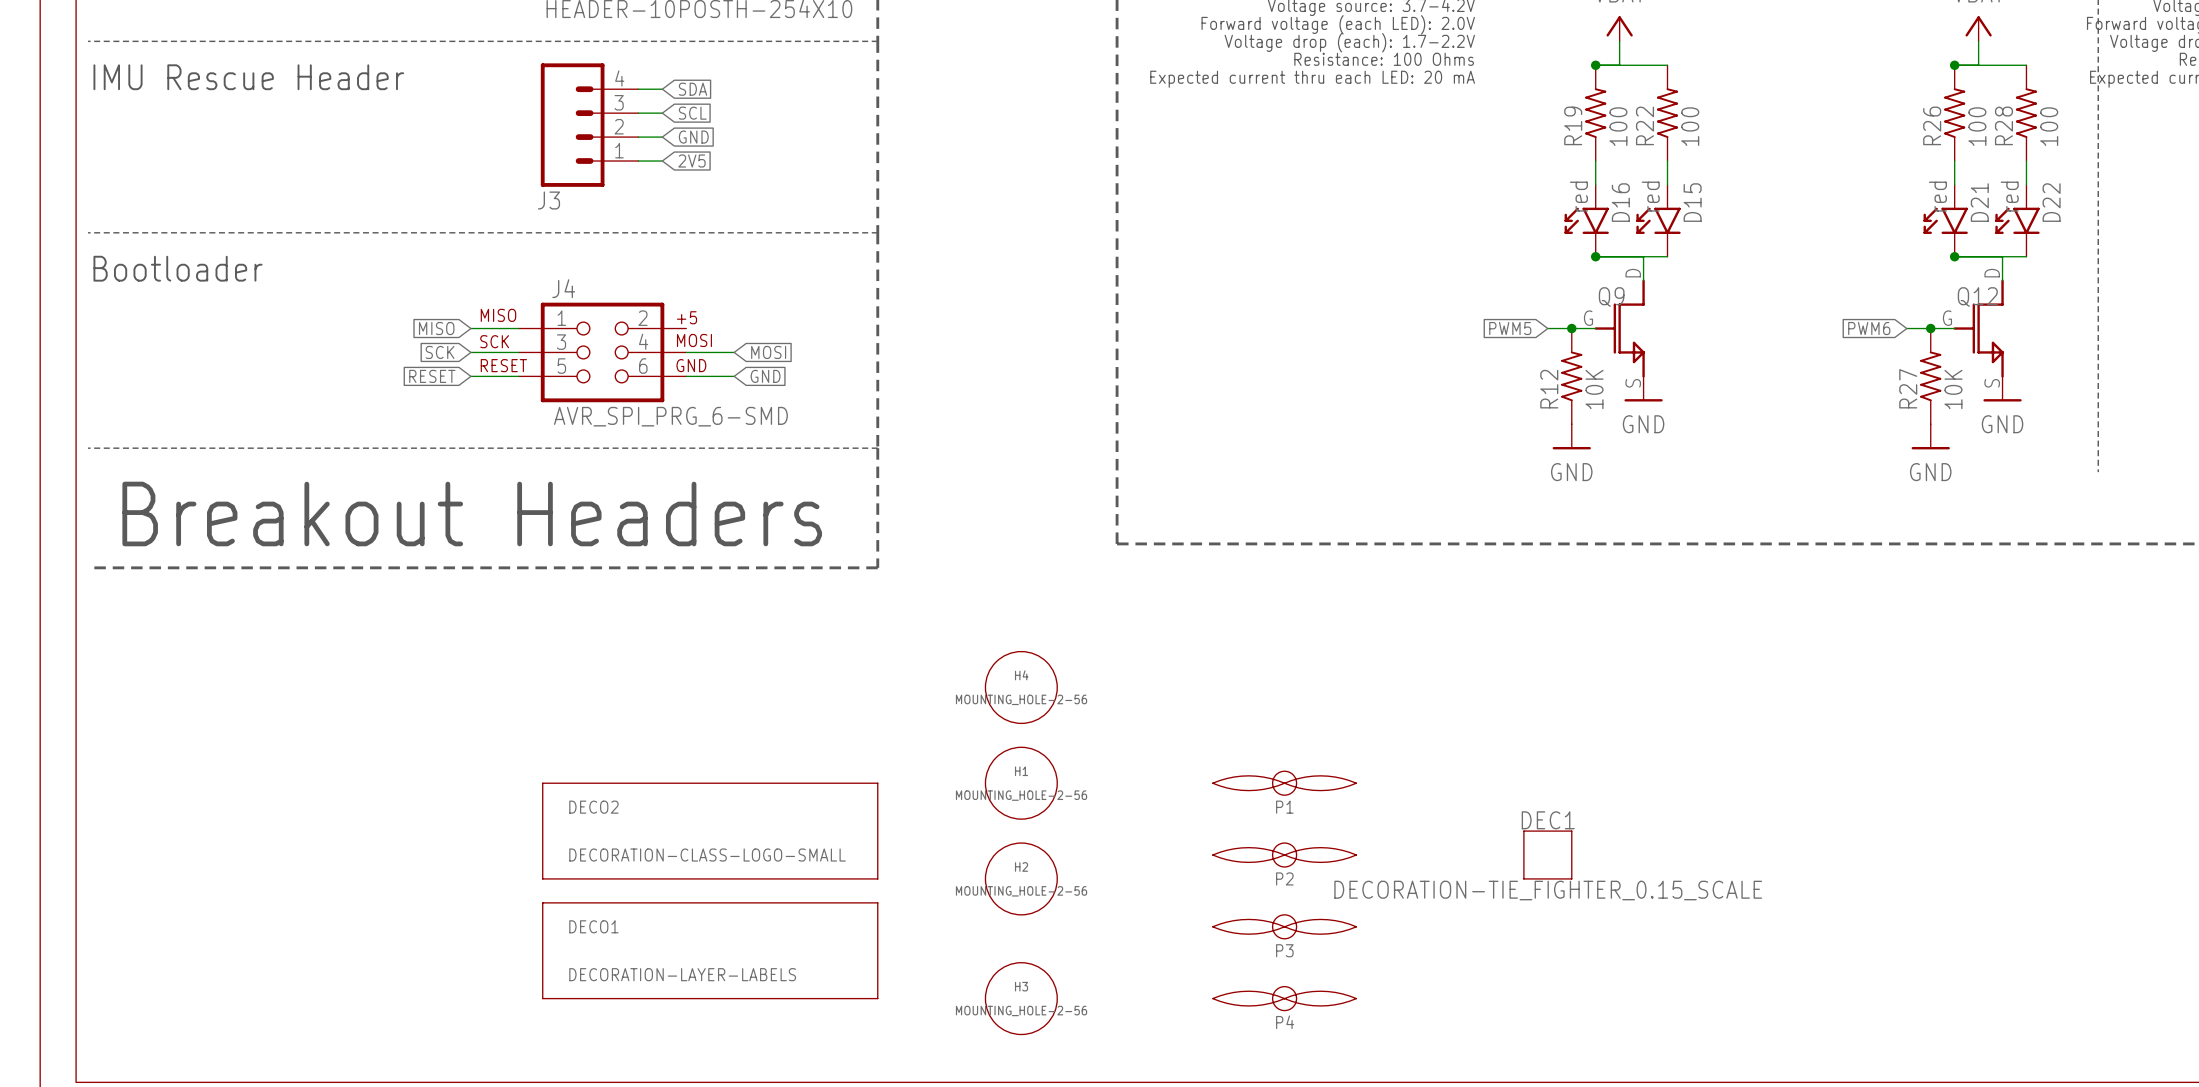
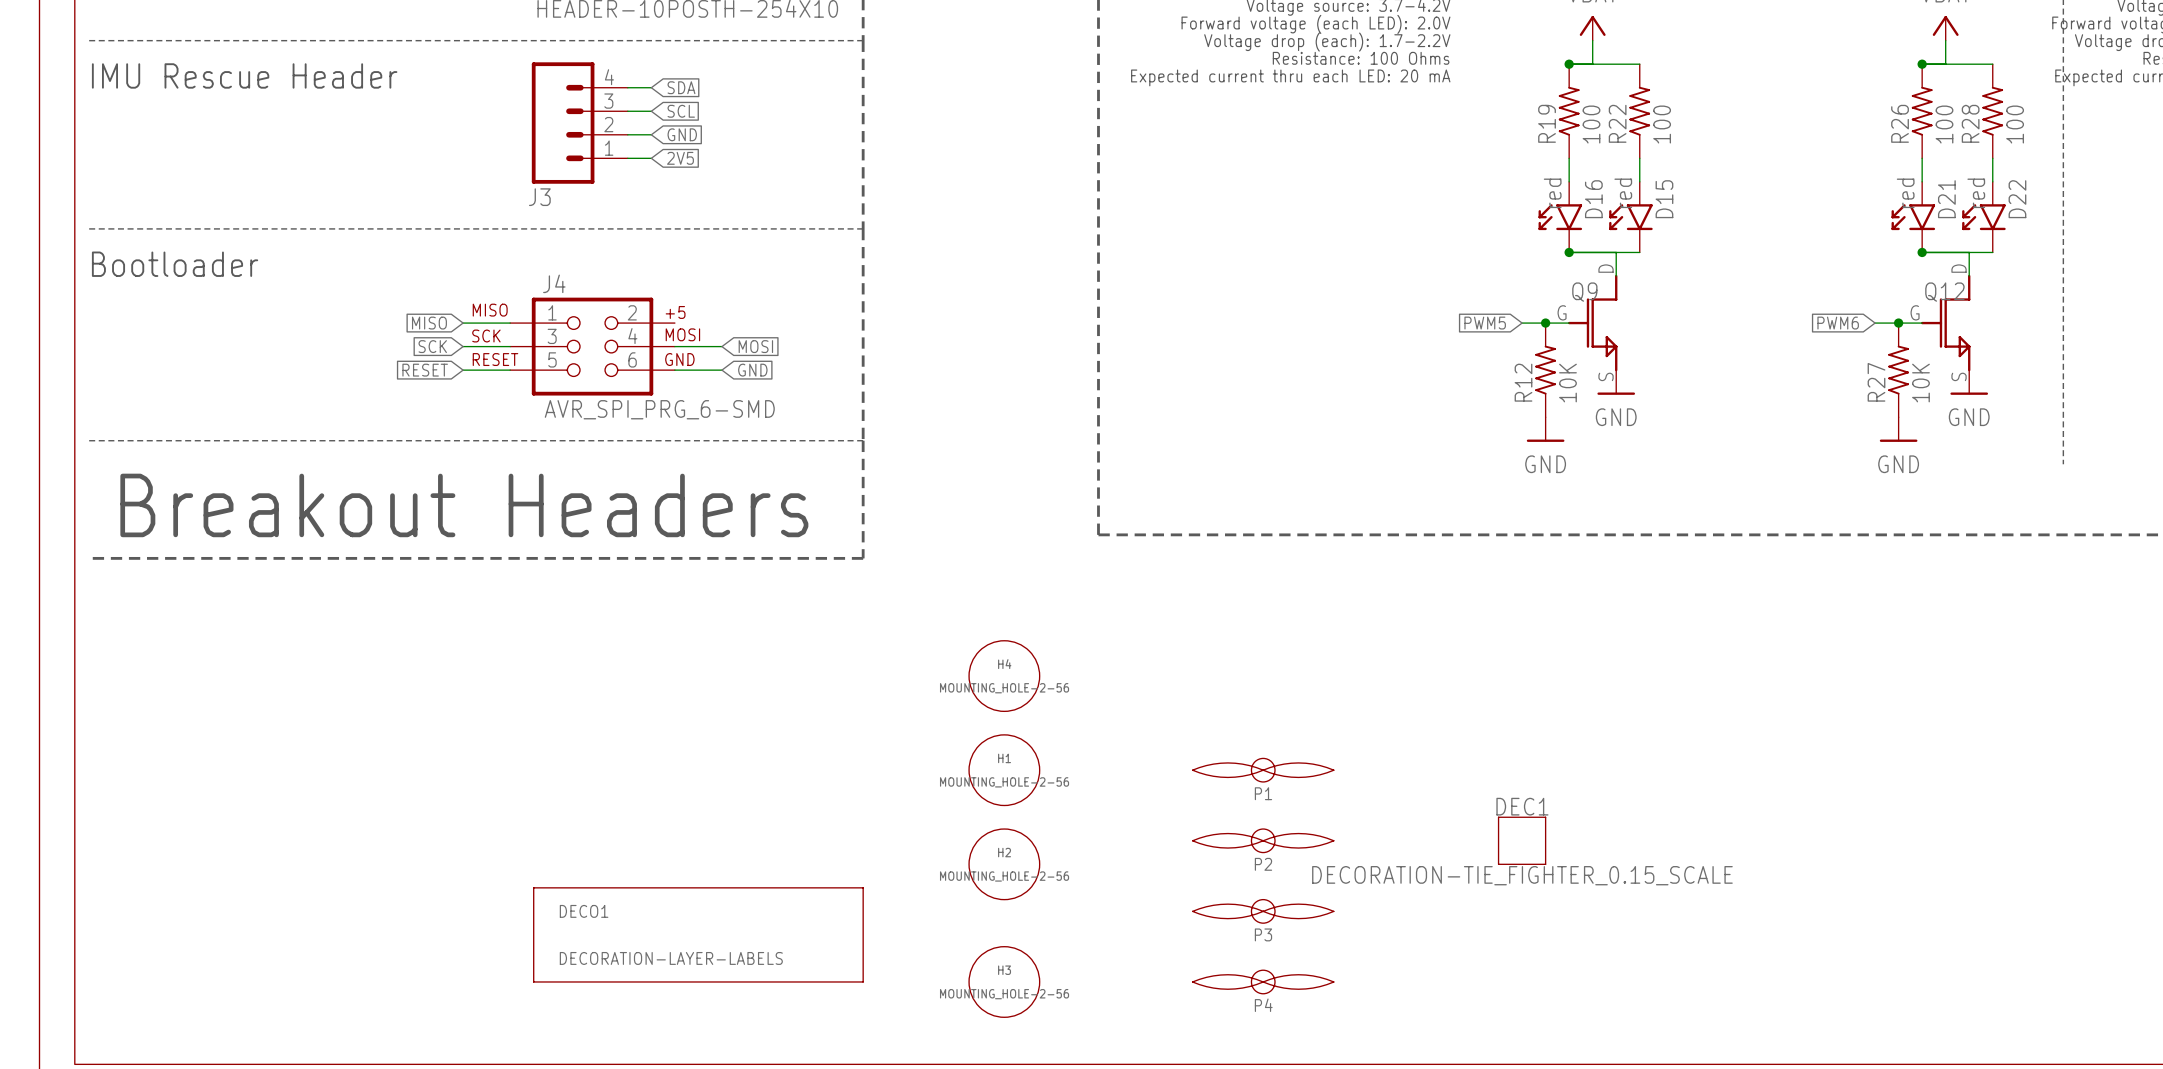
DECO2: DECORATION-CLASS-LOGO-SMALL (710, 831) -> none

